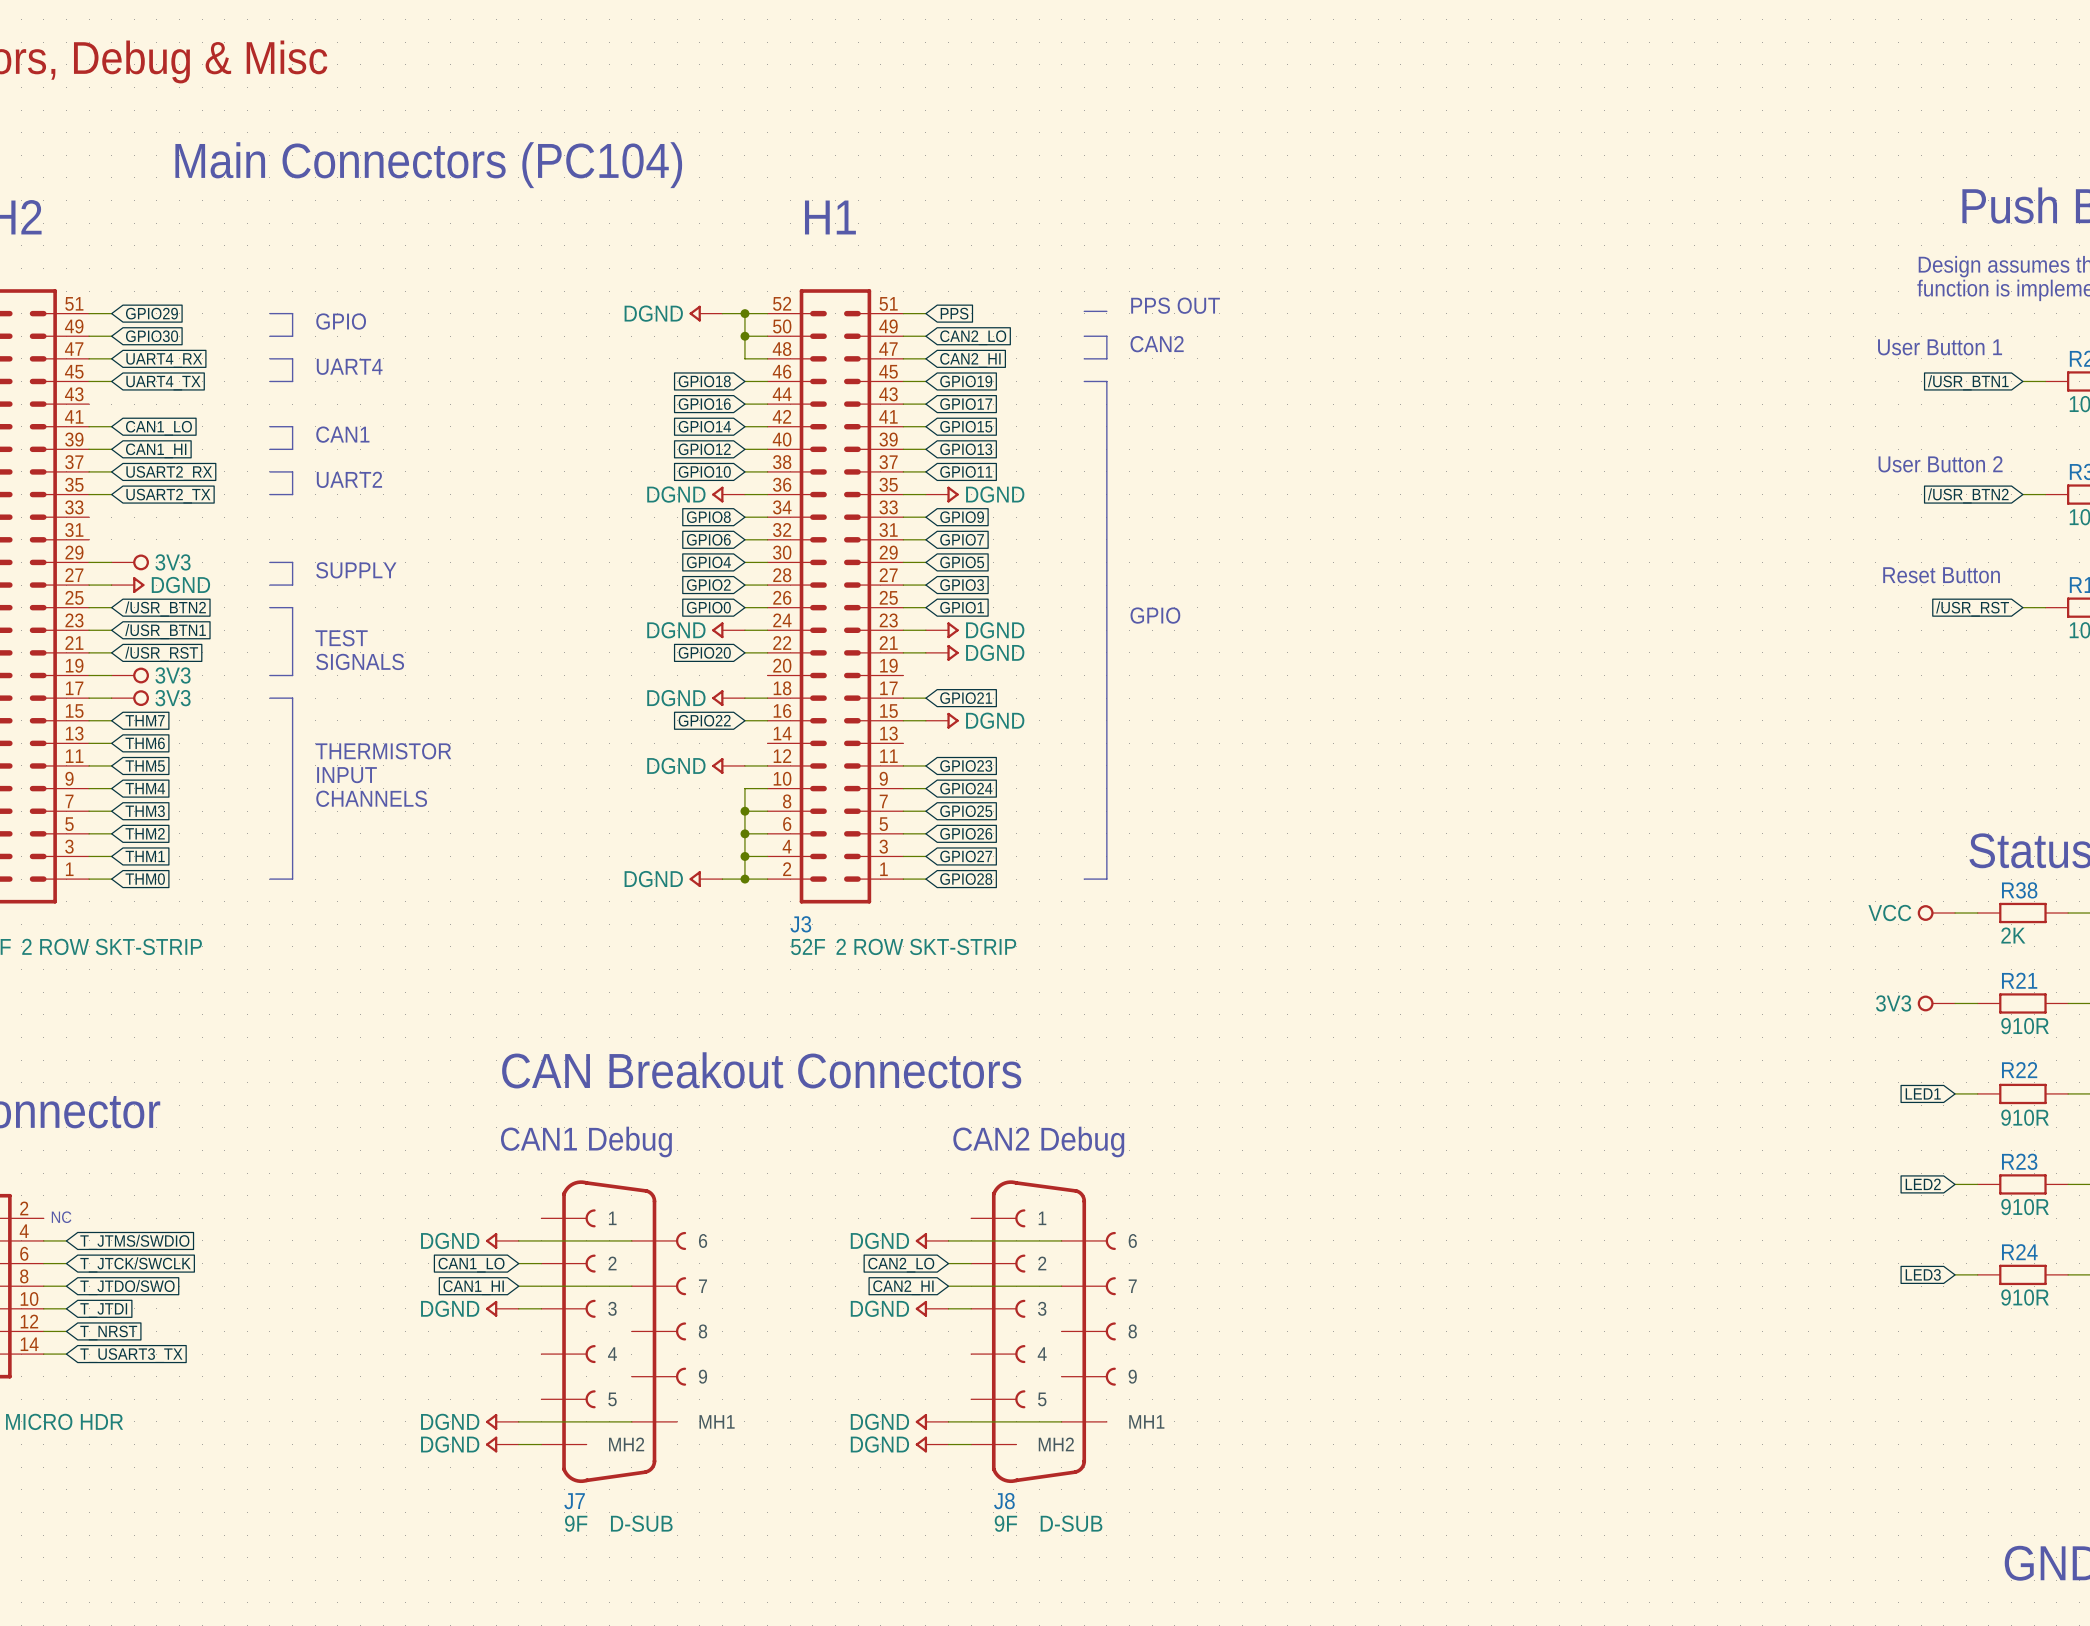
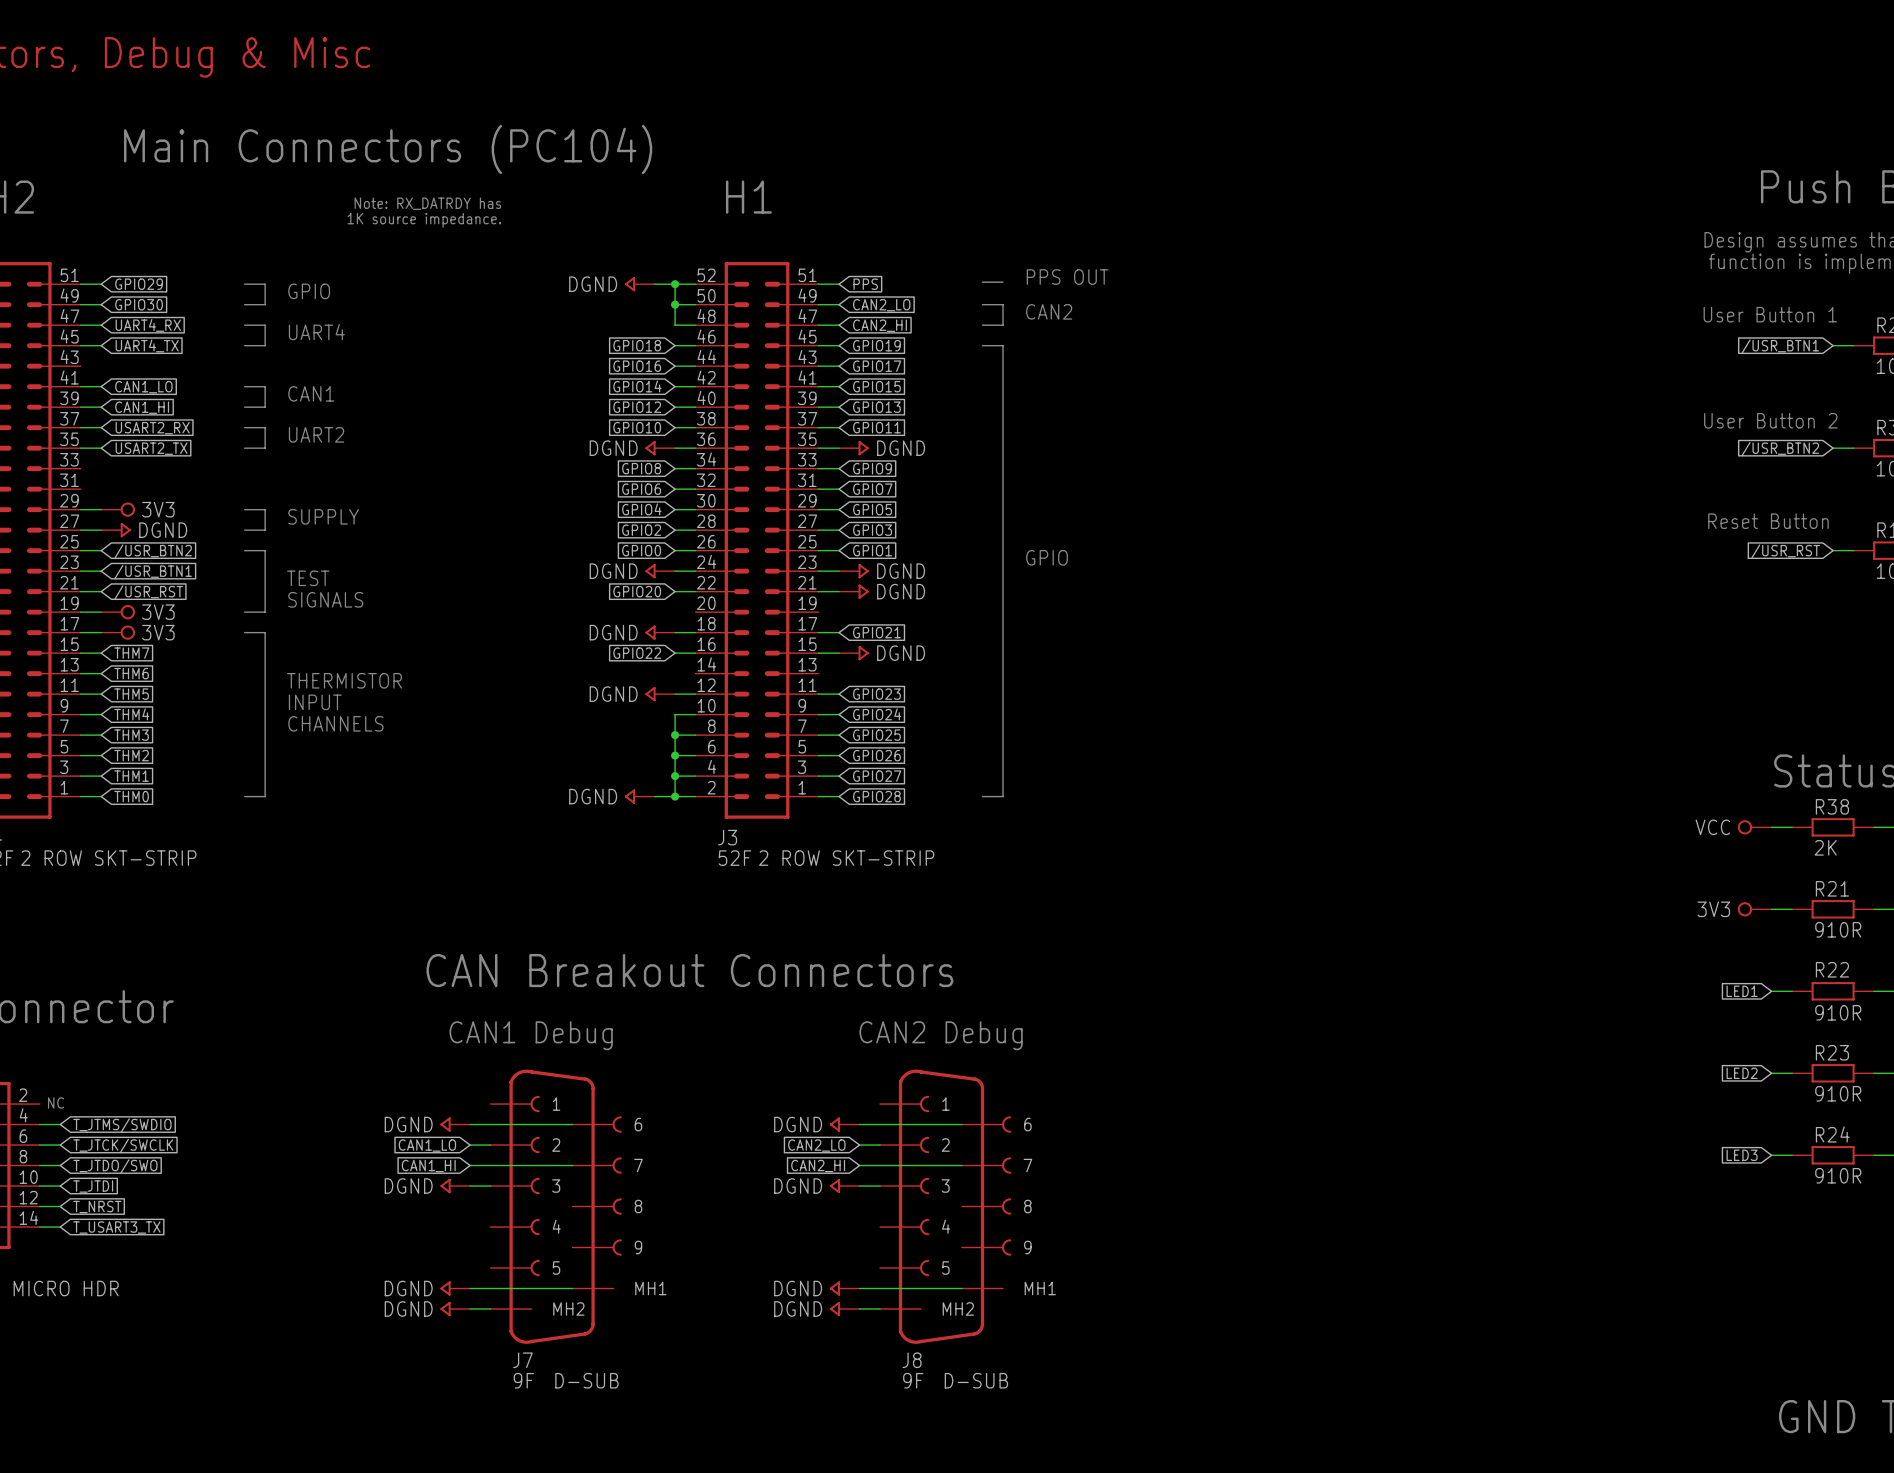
text: none -> Note: RX_DATRDY has (427, 203)
text: none -> 1K source impedance. (424, 220)

